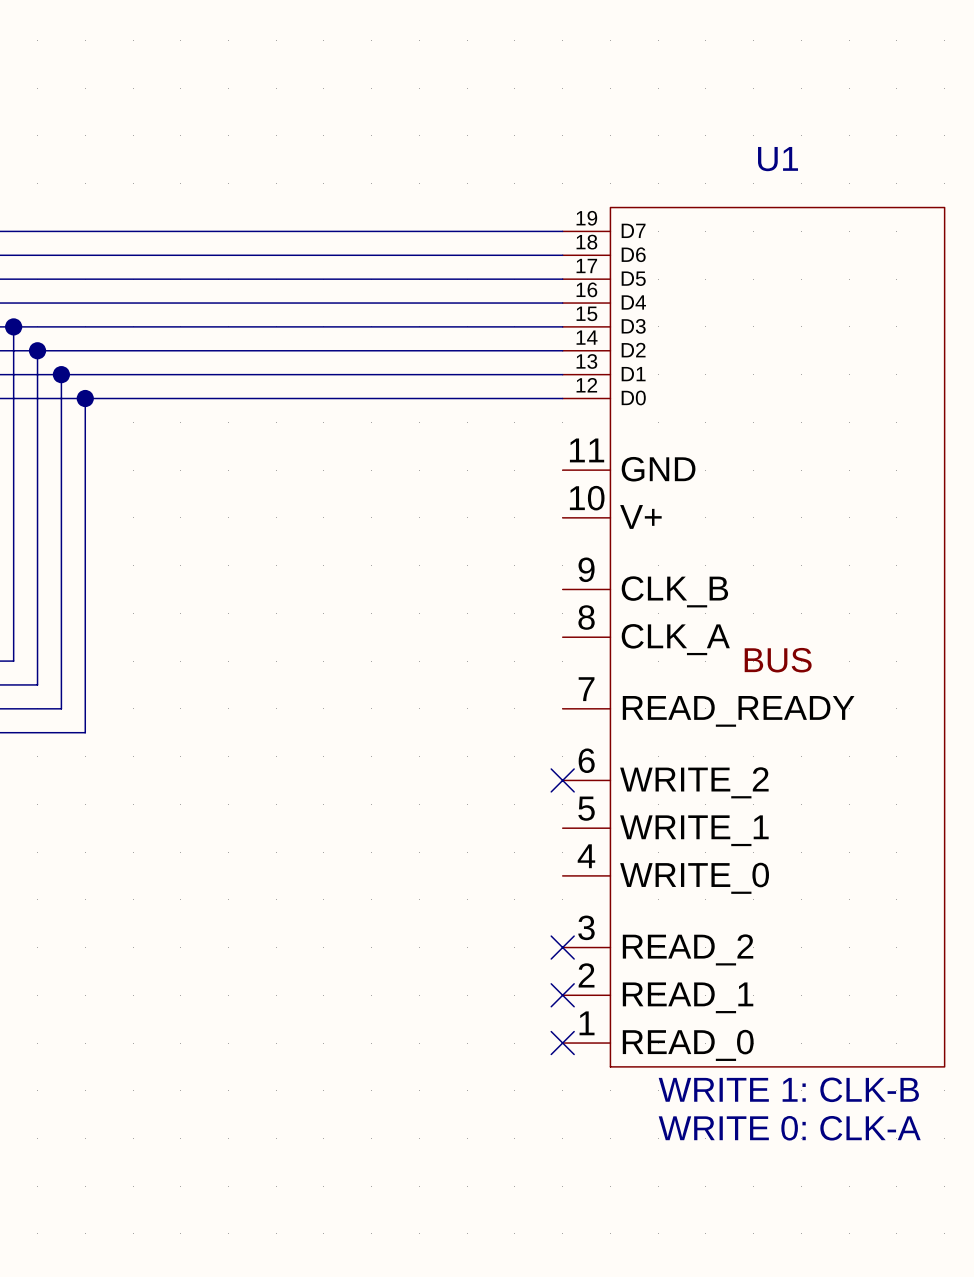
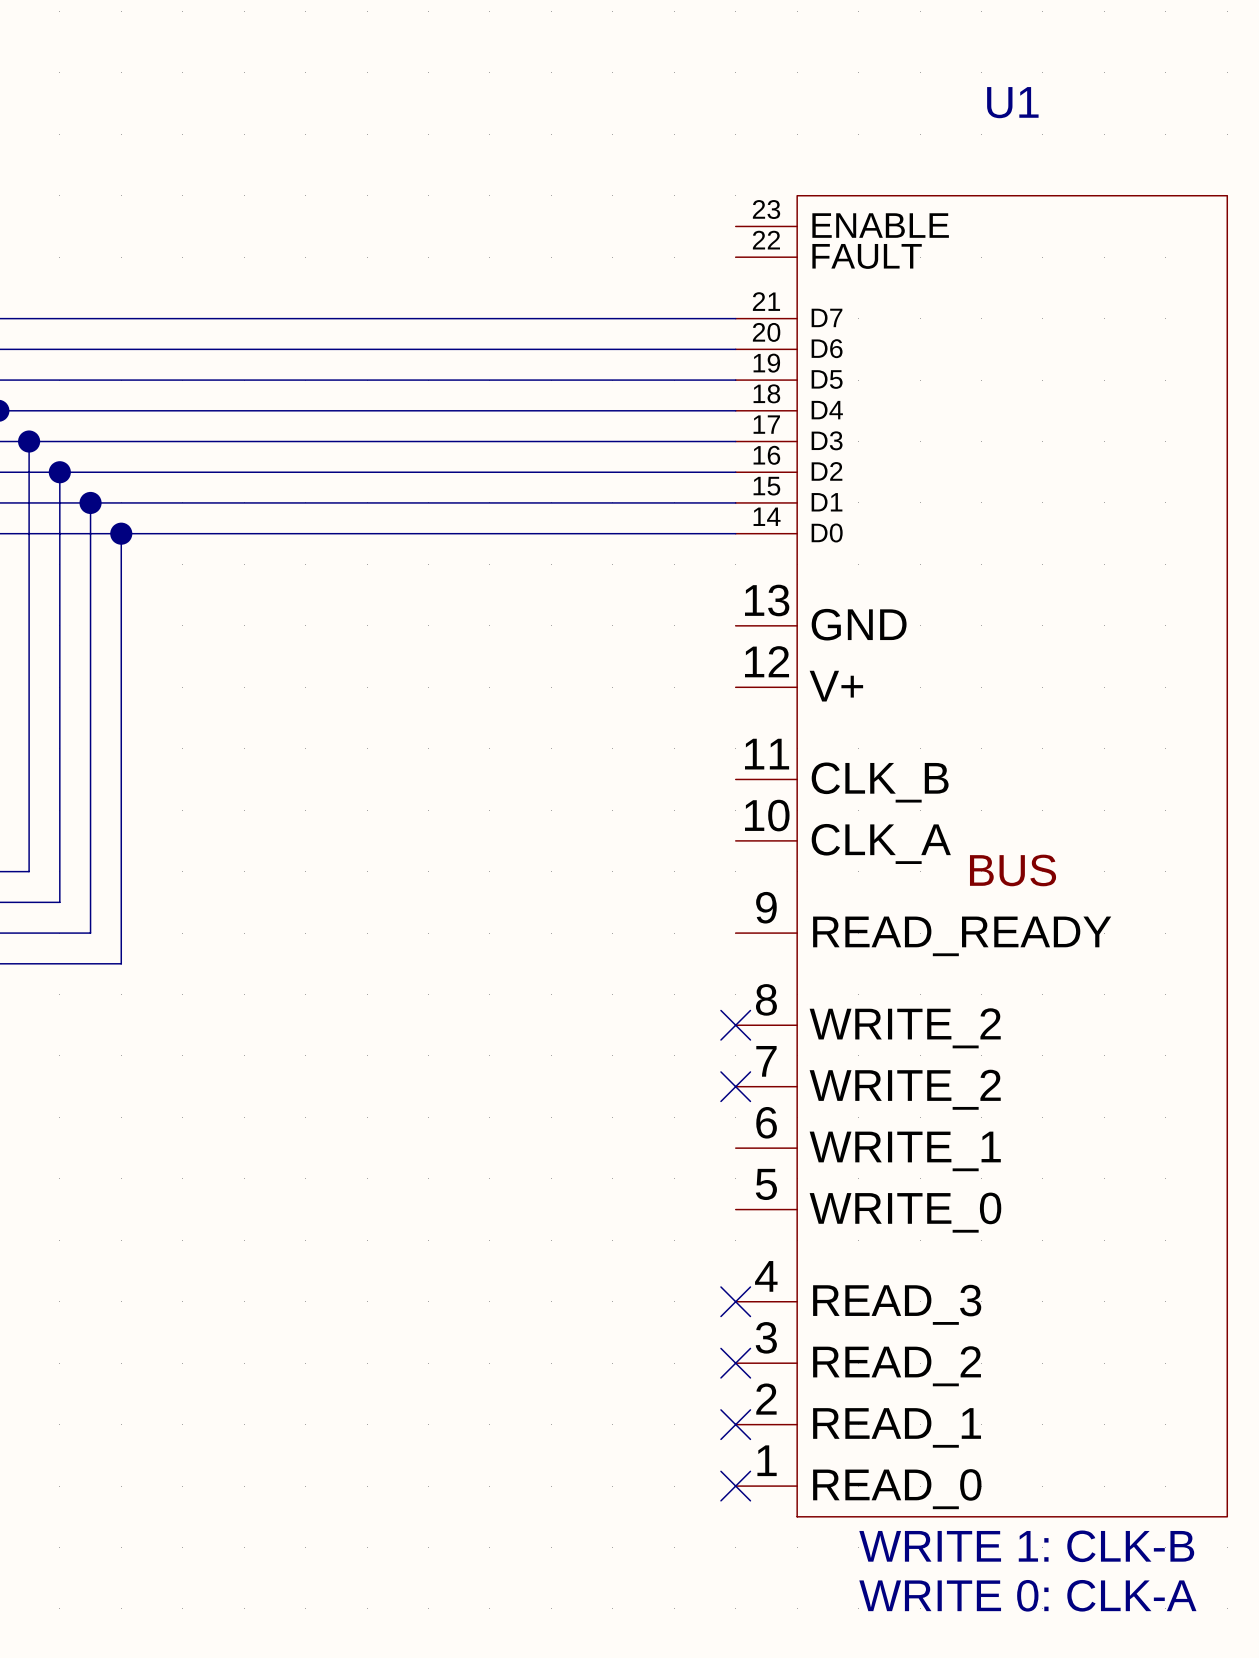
U1 name position: U1 (778, 159) -> U1 (1012, 102)
U1 symbol: [562, 207, 945, 1067] -> [735, 195, 1228, 1517]
no-connect mark: none -> (735, 1086)
no-connect mark: (562, 947) -> none
text position: WRITE 1: CLK-B (788, 1089) -> WRITE 1: CLK-B (1026, 1546)
no-connect mark: none -> (735, 1424)
text position: WRITE 0: CLK-A (789, 1128) -> WRITE 0: CLK-A (1027, 1595)
no-connect mark: none -> (735, 1486)

